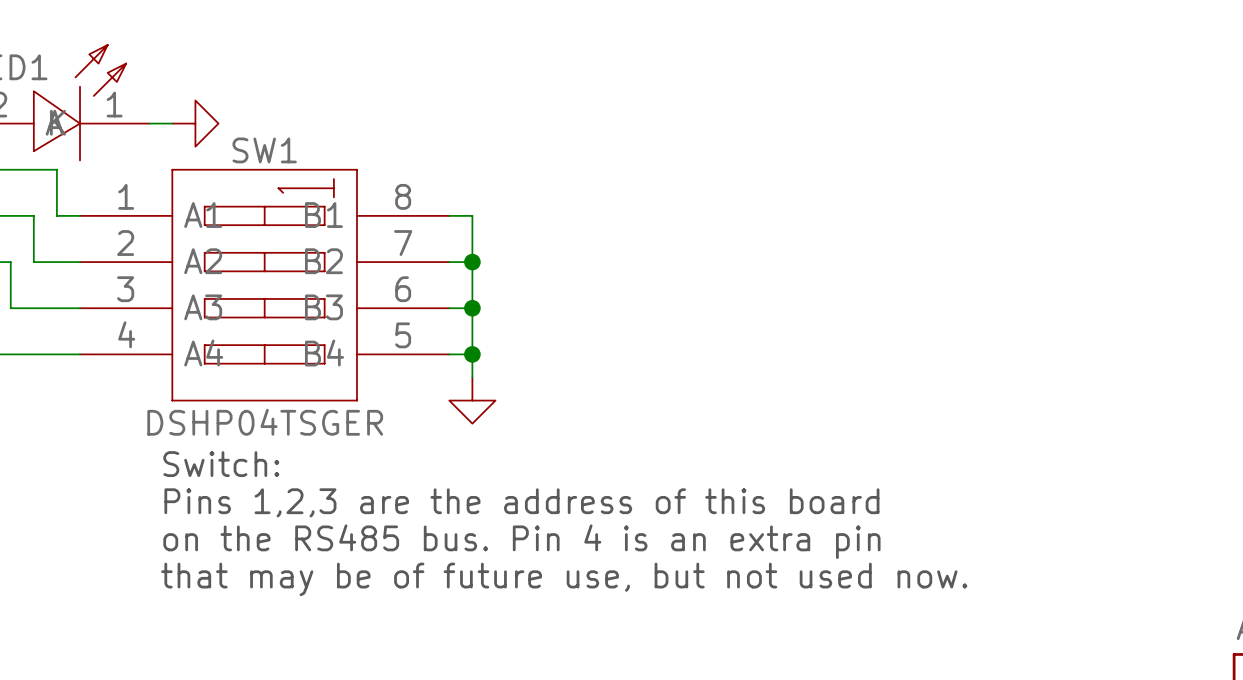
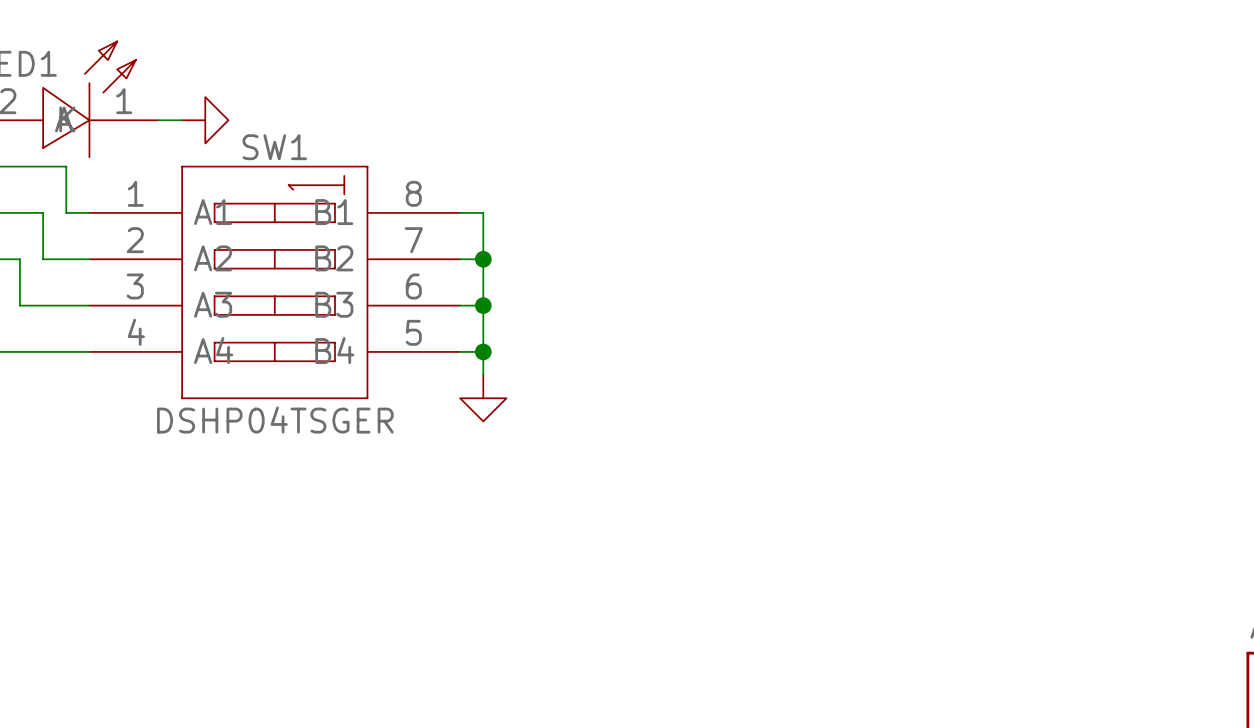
text: Switch: (221, 464) -> none
text: Pins 1,2,3 are the address of this board (521, 502) -> none
text: on the RS485 bus. Pin 4 is an extra pin (521, 541) -> none
text: that may be of future use, but not used now. (564, 579) -> none

